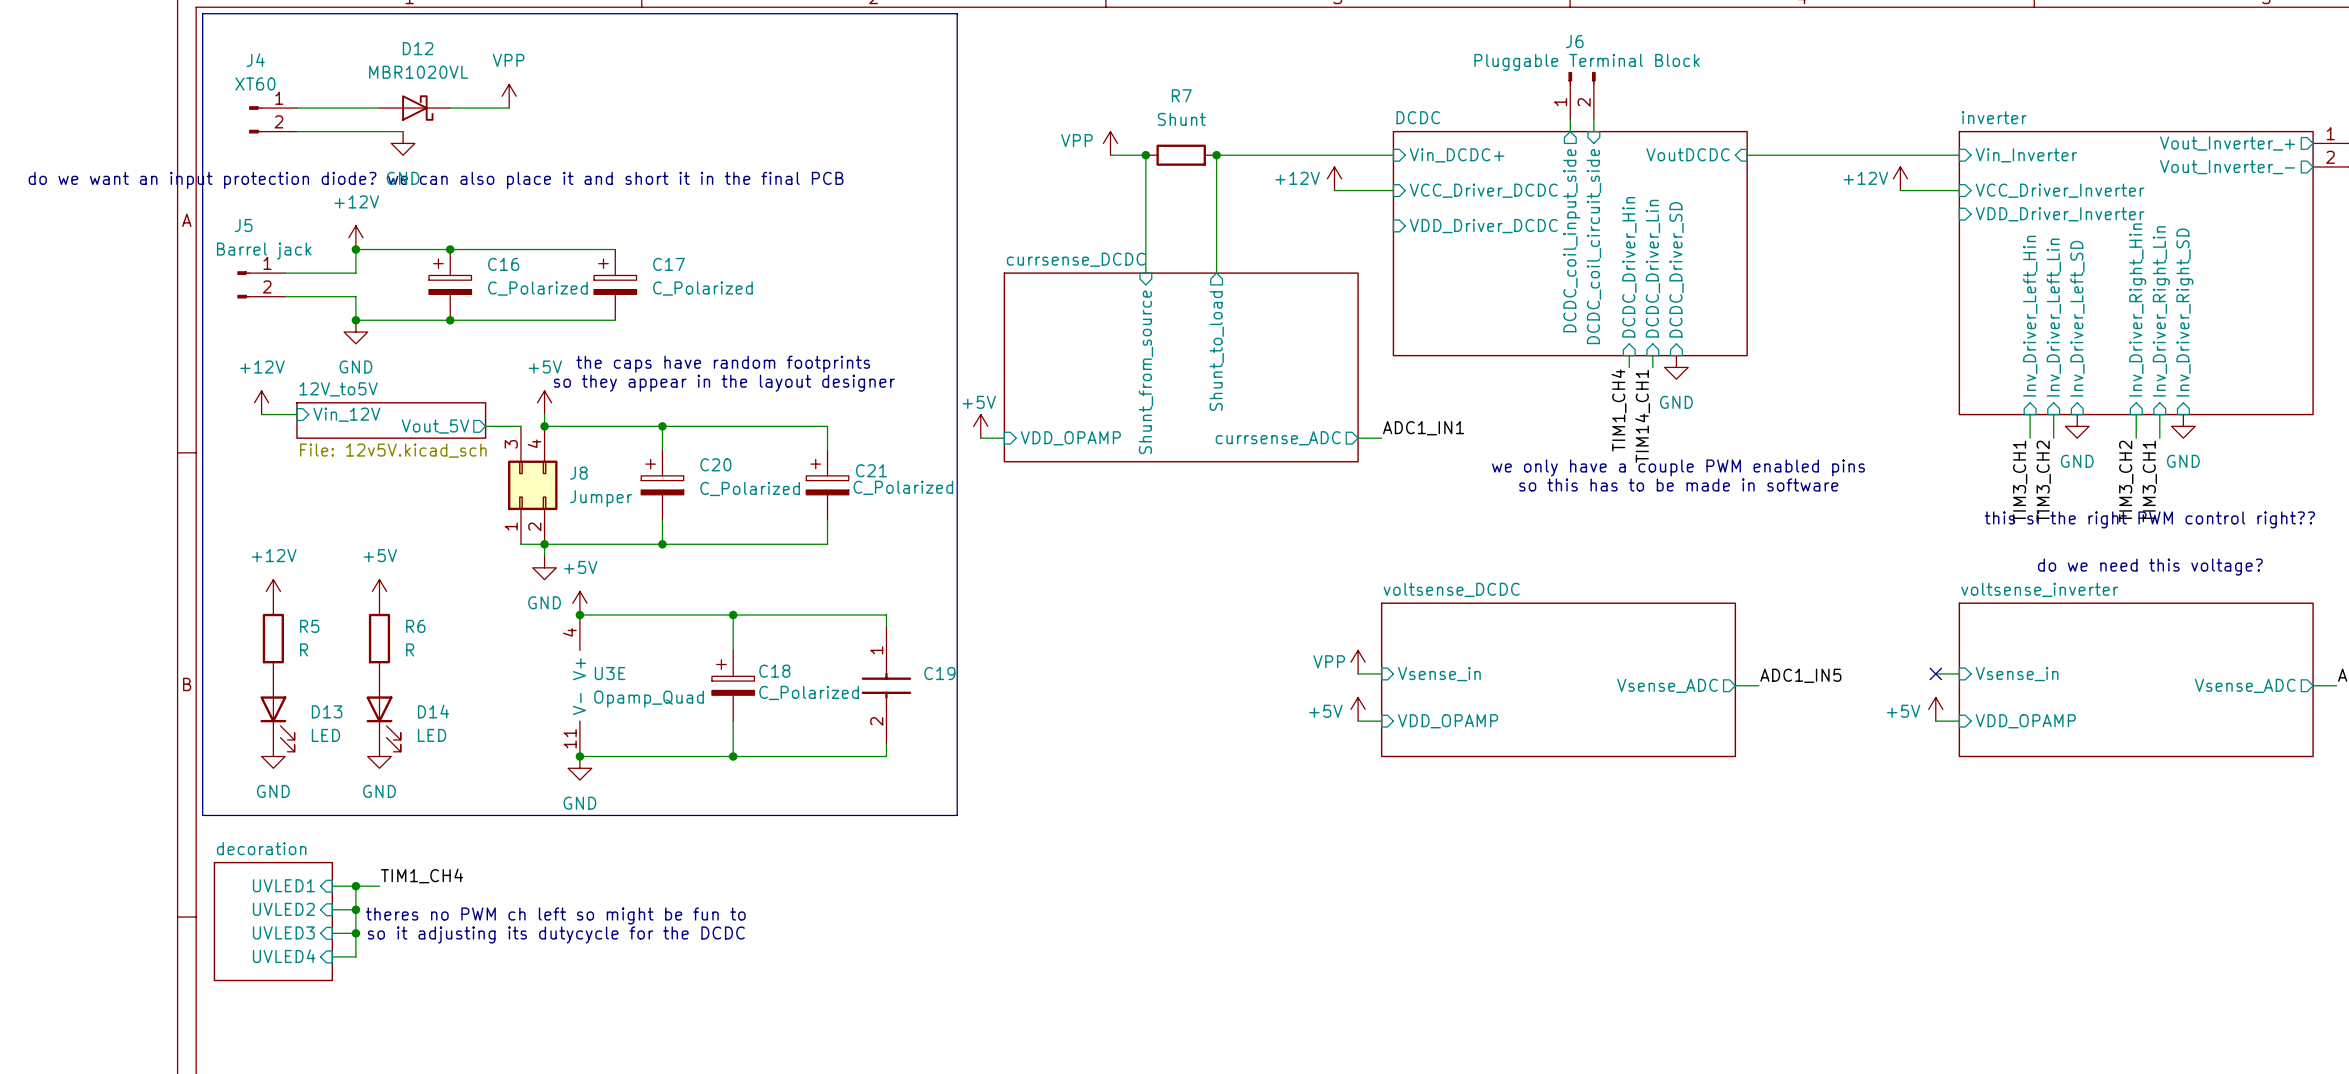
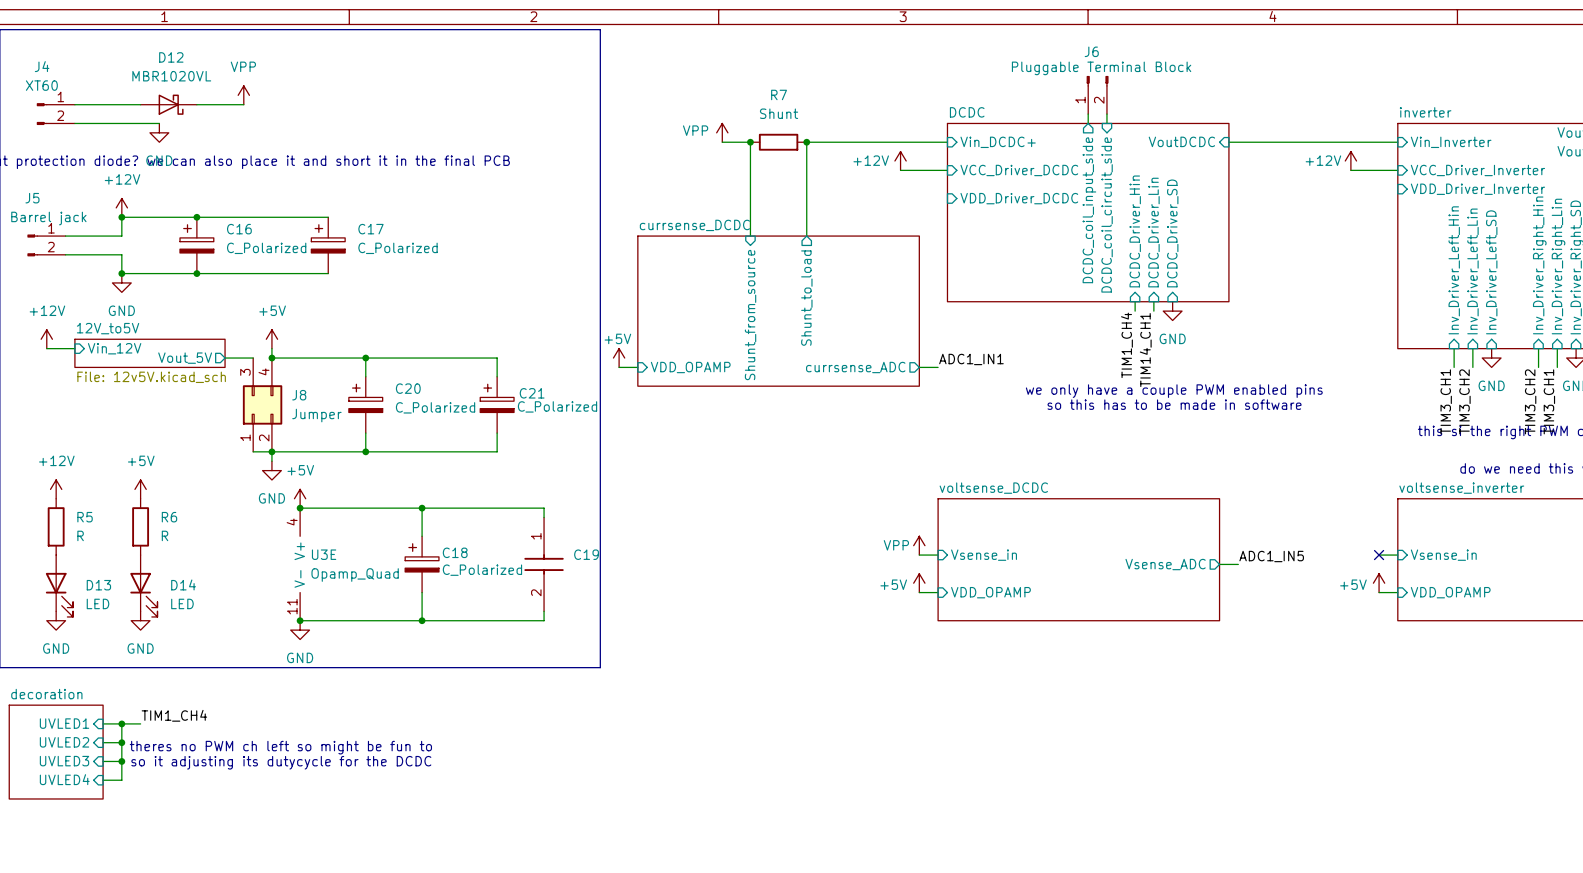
text: the caps have random footprints (723, 364) -> none
text: so they appear in the layout designer (724, 383) -> none

